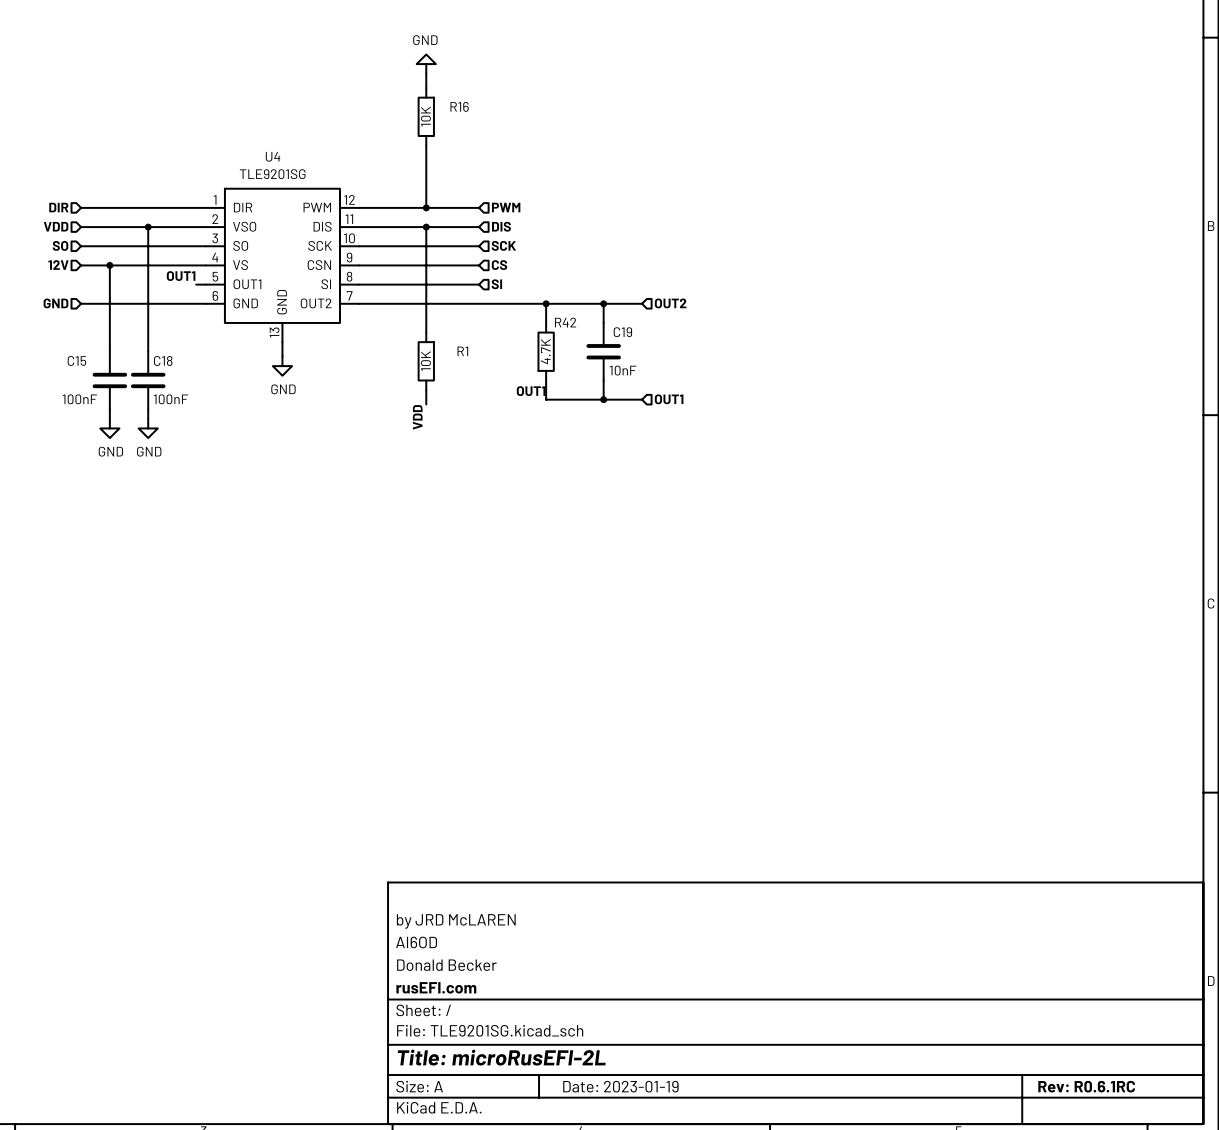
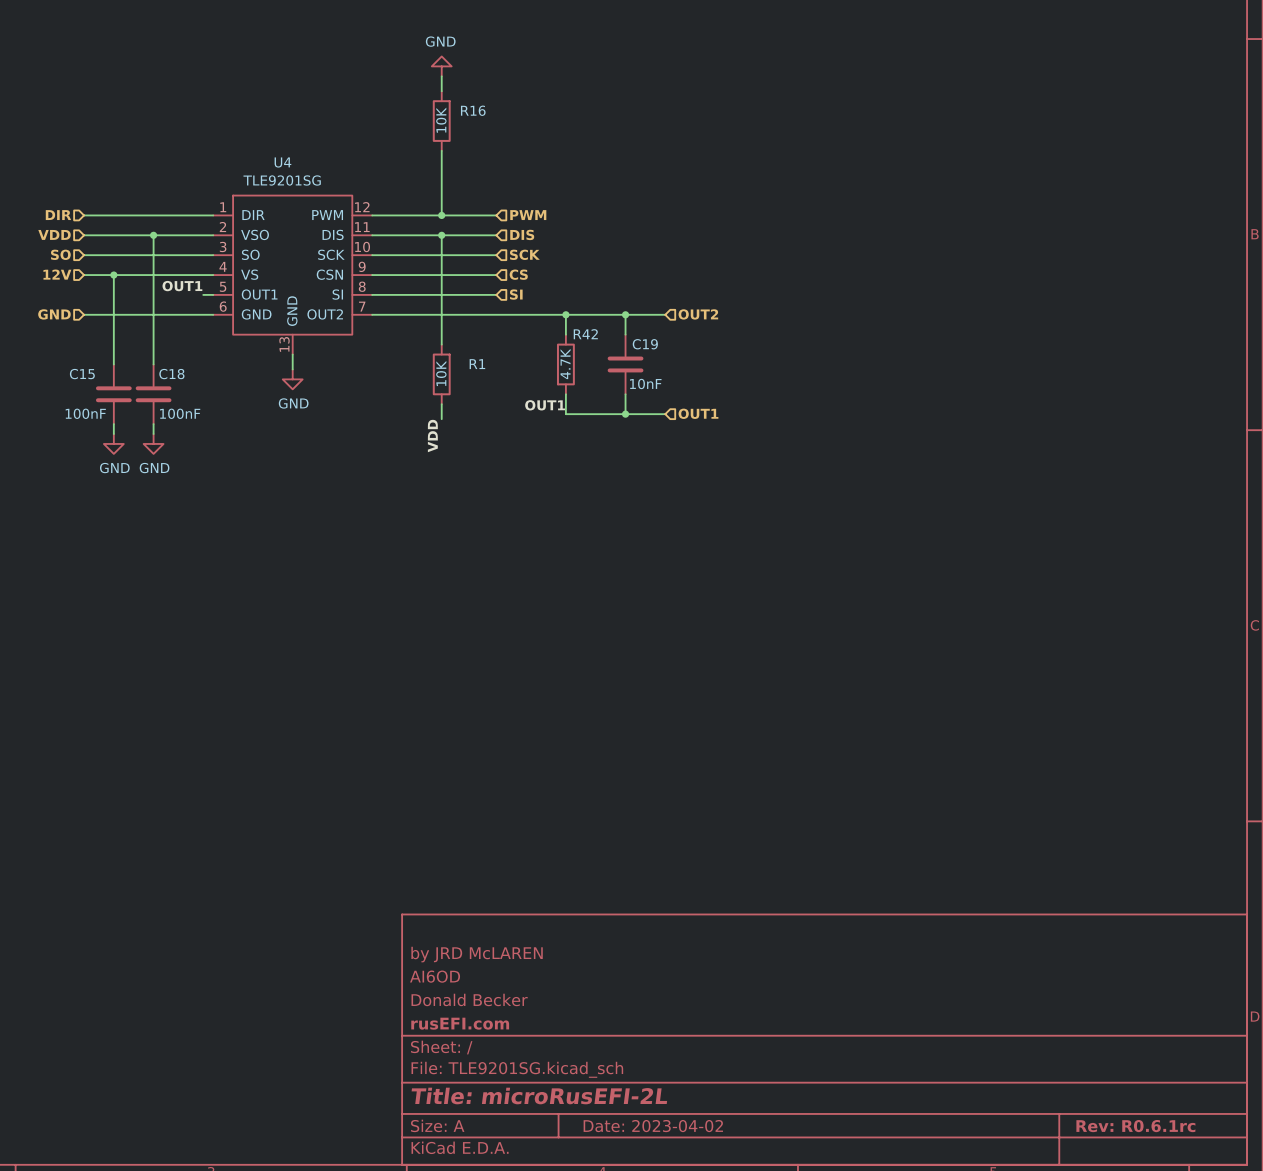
title block: Date: 2023-01-19 (620, 1086) -> Date: 2023-04-02 (653, 1126)
title block: Rev: R0.6.1RC (1086, 1086) -> Rev: R0.6.1rc (1135, 1126)

